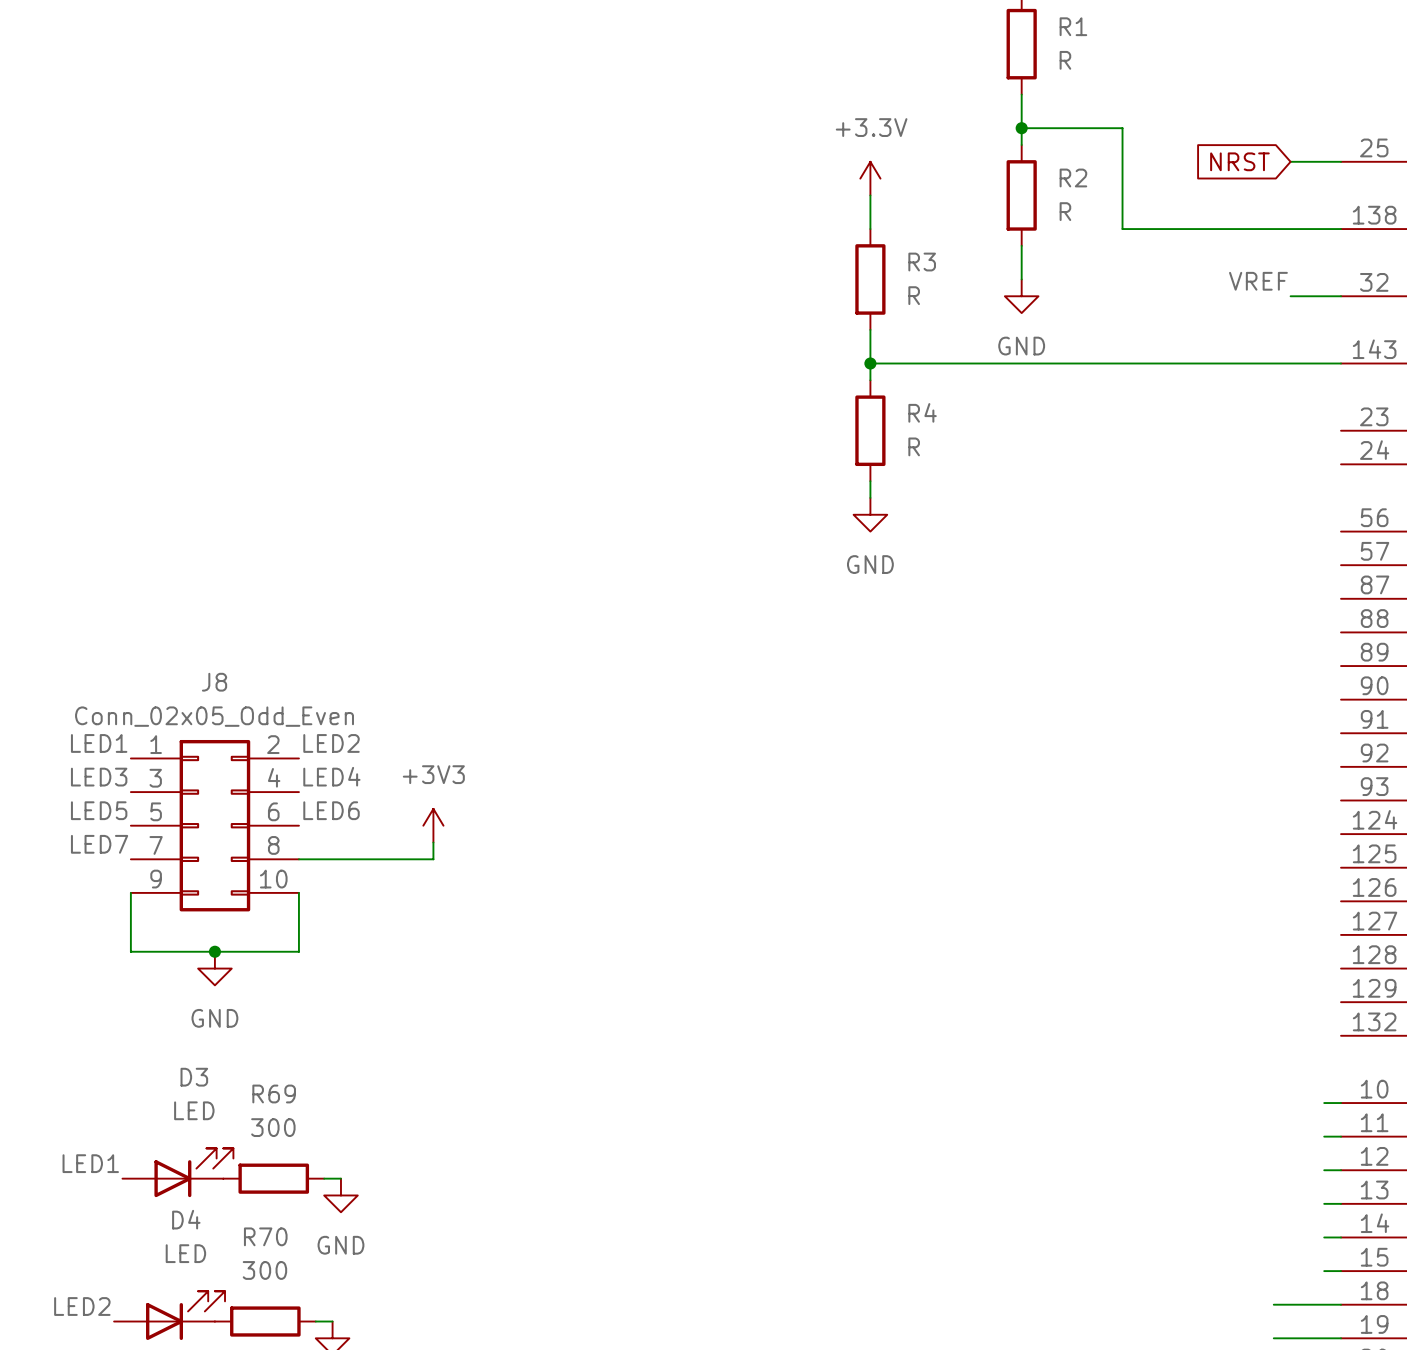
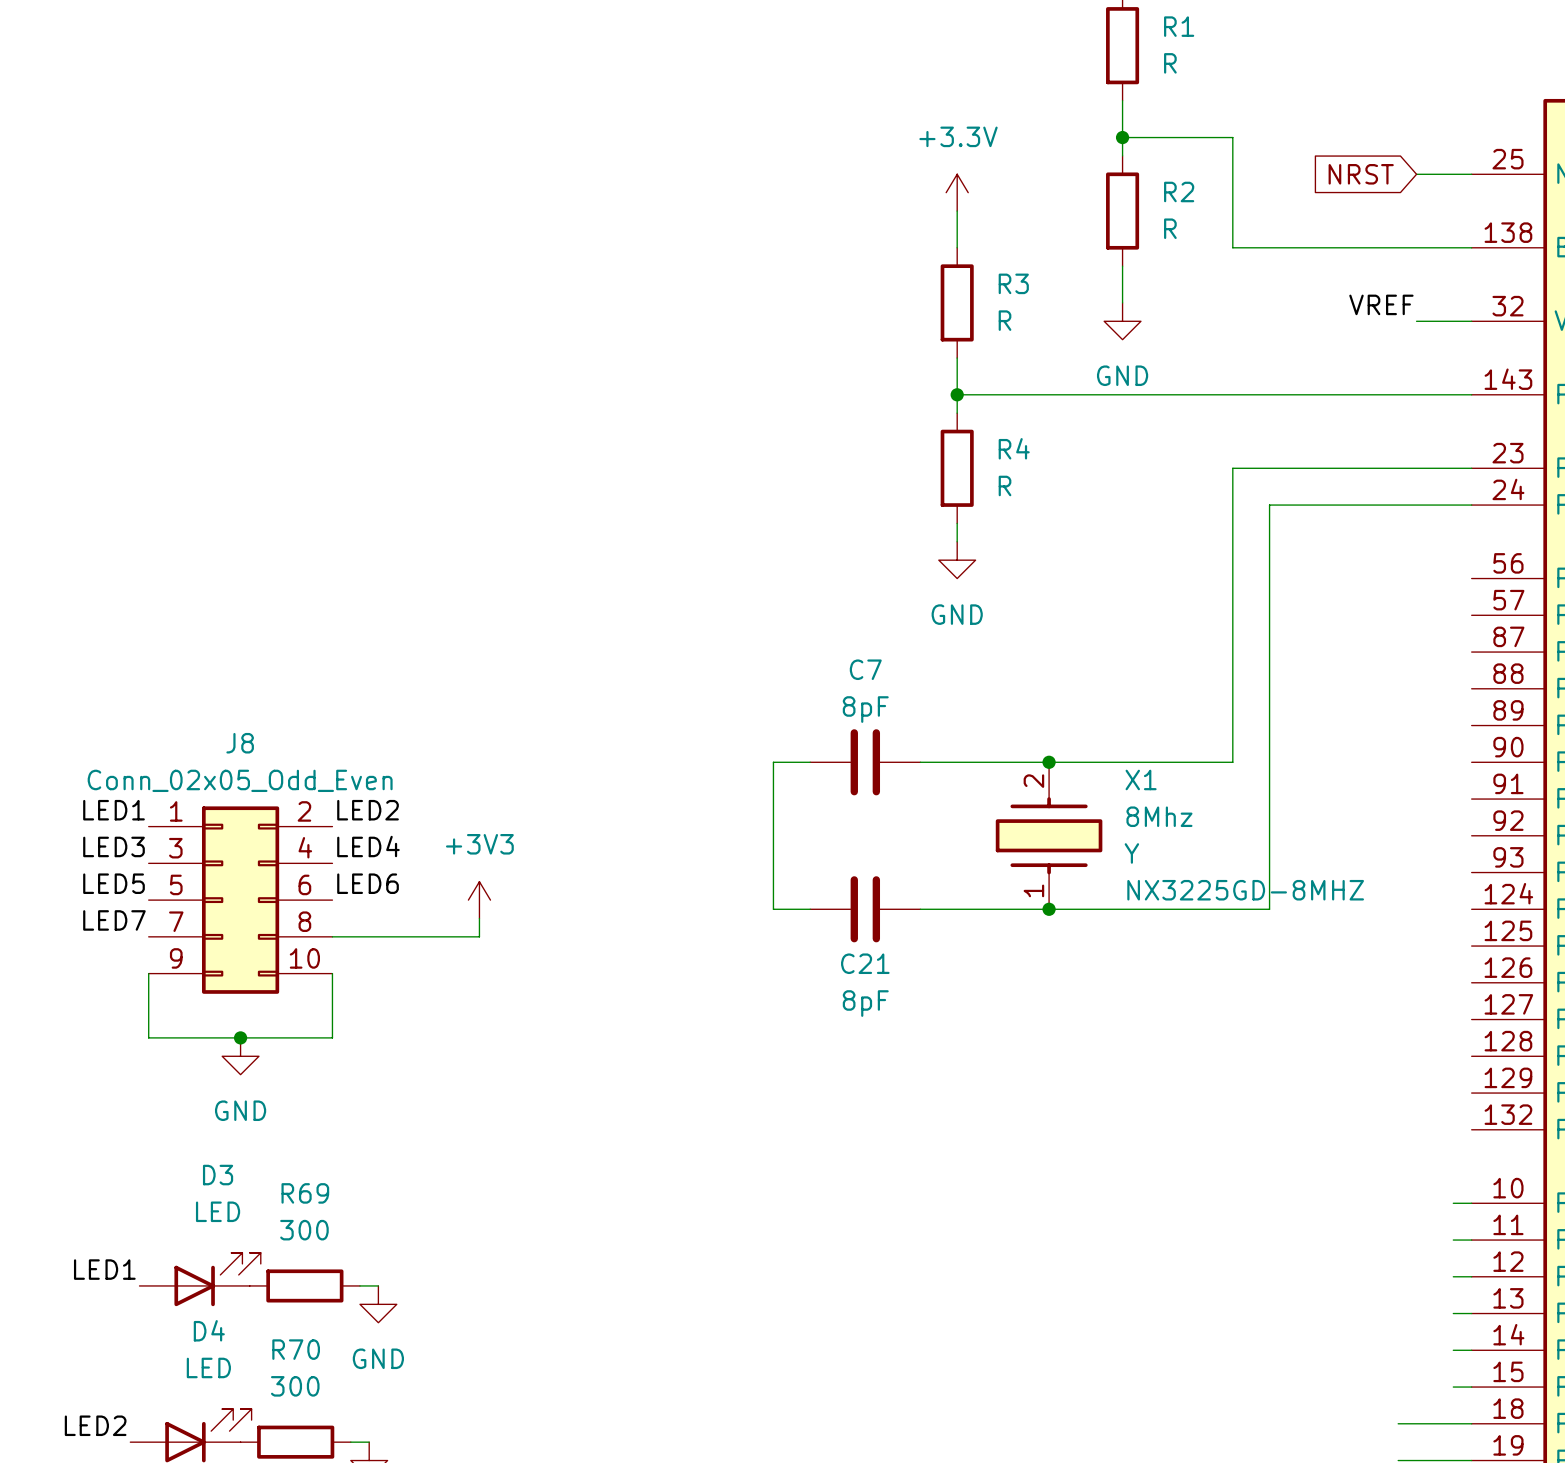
wire: none -> (1471, 468) (1232, 468) (1232, 762) (920, 762)
wire: none -> (1471, 505) (1269, 505) (1269, 909) (920, 909)
wire: none -> (810, 762) (773, 762) (773, 909) (810, 909)
C7: none -> 8pF (865, 762)
junction: none -> (1049, 762)
X1: none -> 8Mhz (1049, 835)
C21: none -> 8pF (865, 909)
junction: none -> (1049, 909)

